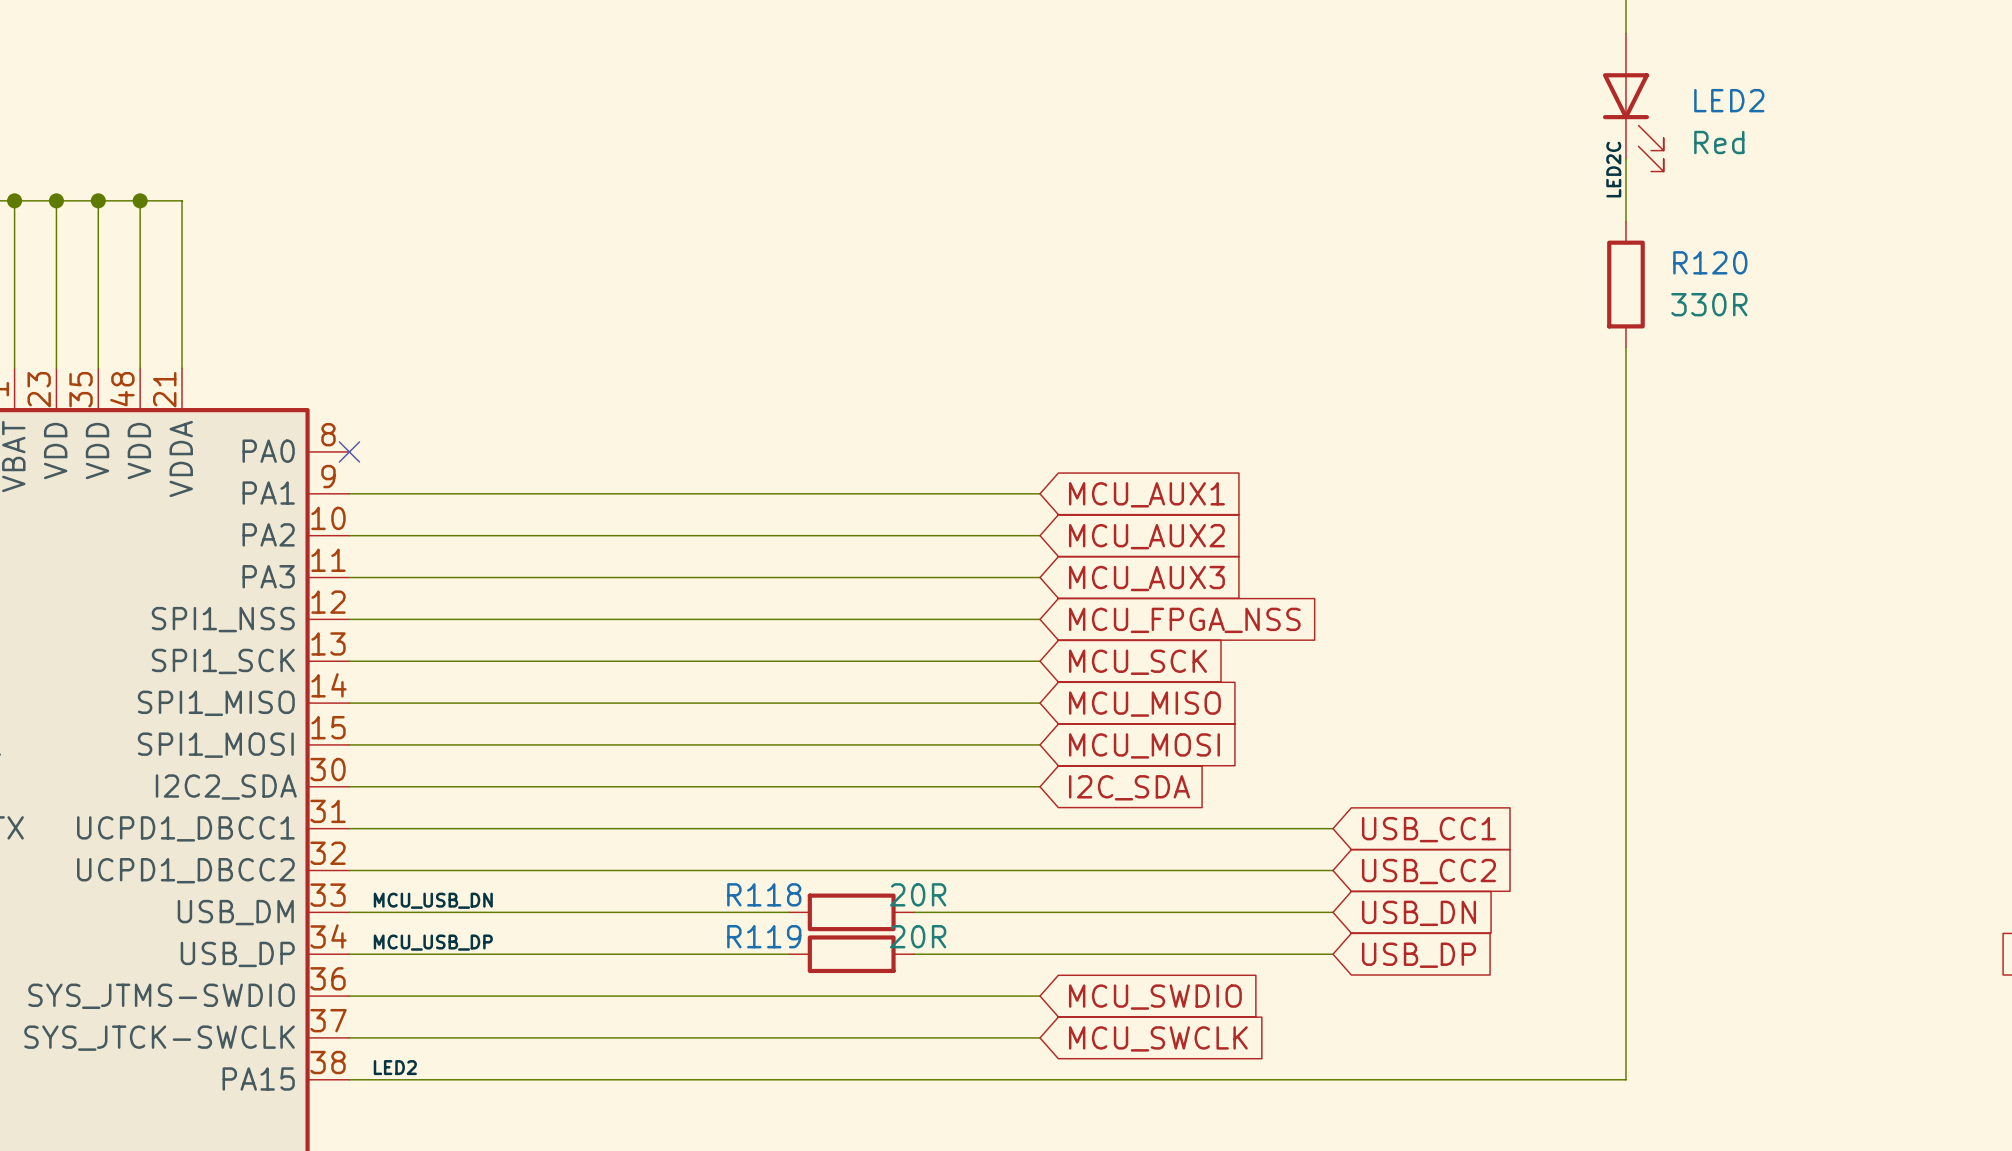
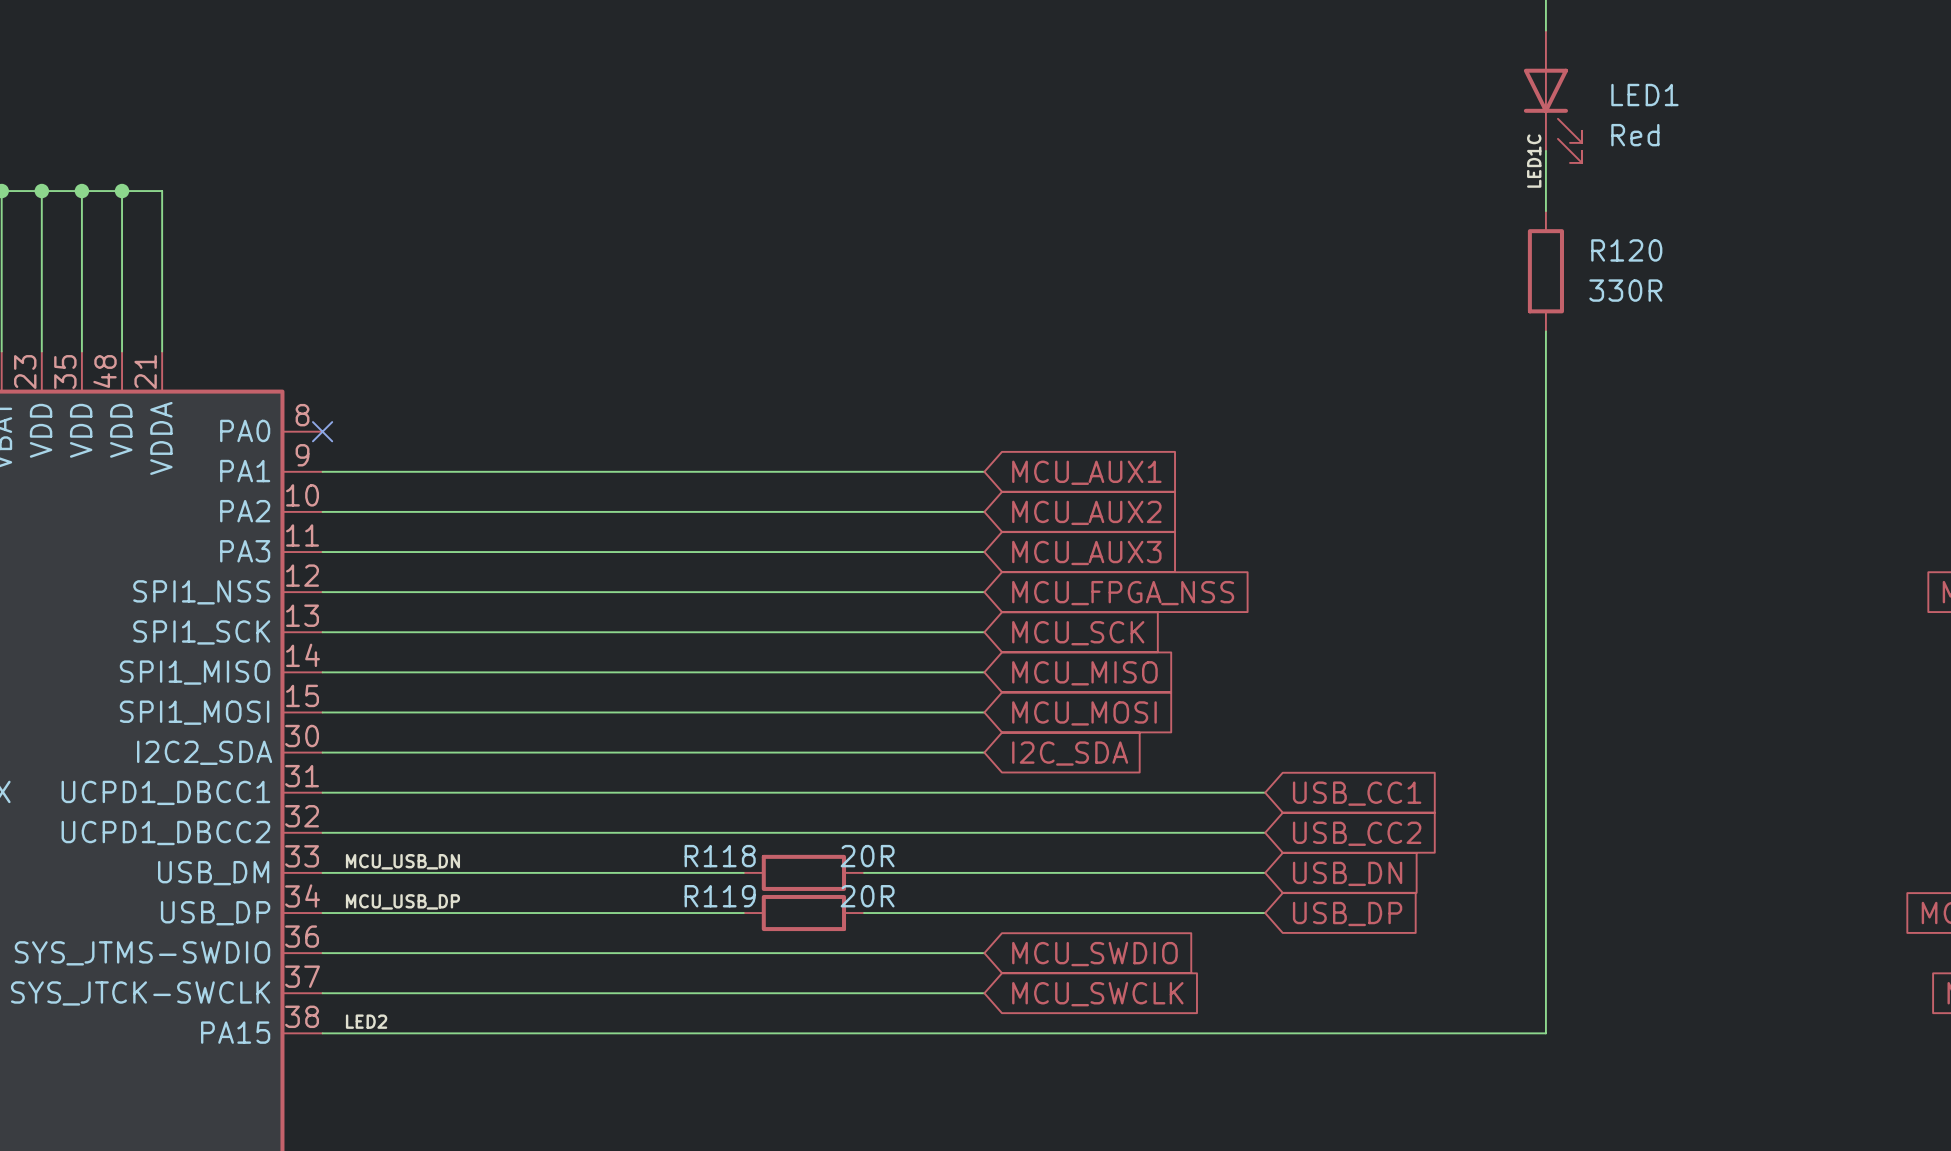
LED2 name: LED2 (1729, 100) -> LED1 (1644, 95)
label: LED2C (1613, 169) -> LED1C (1534, 161)

